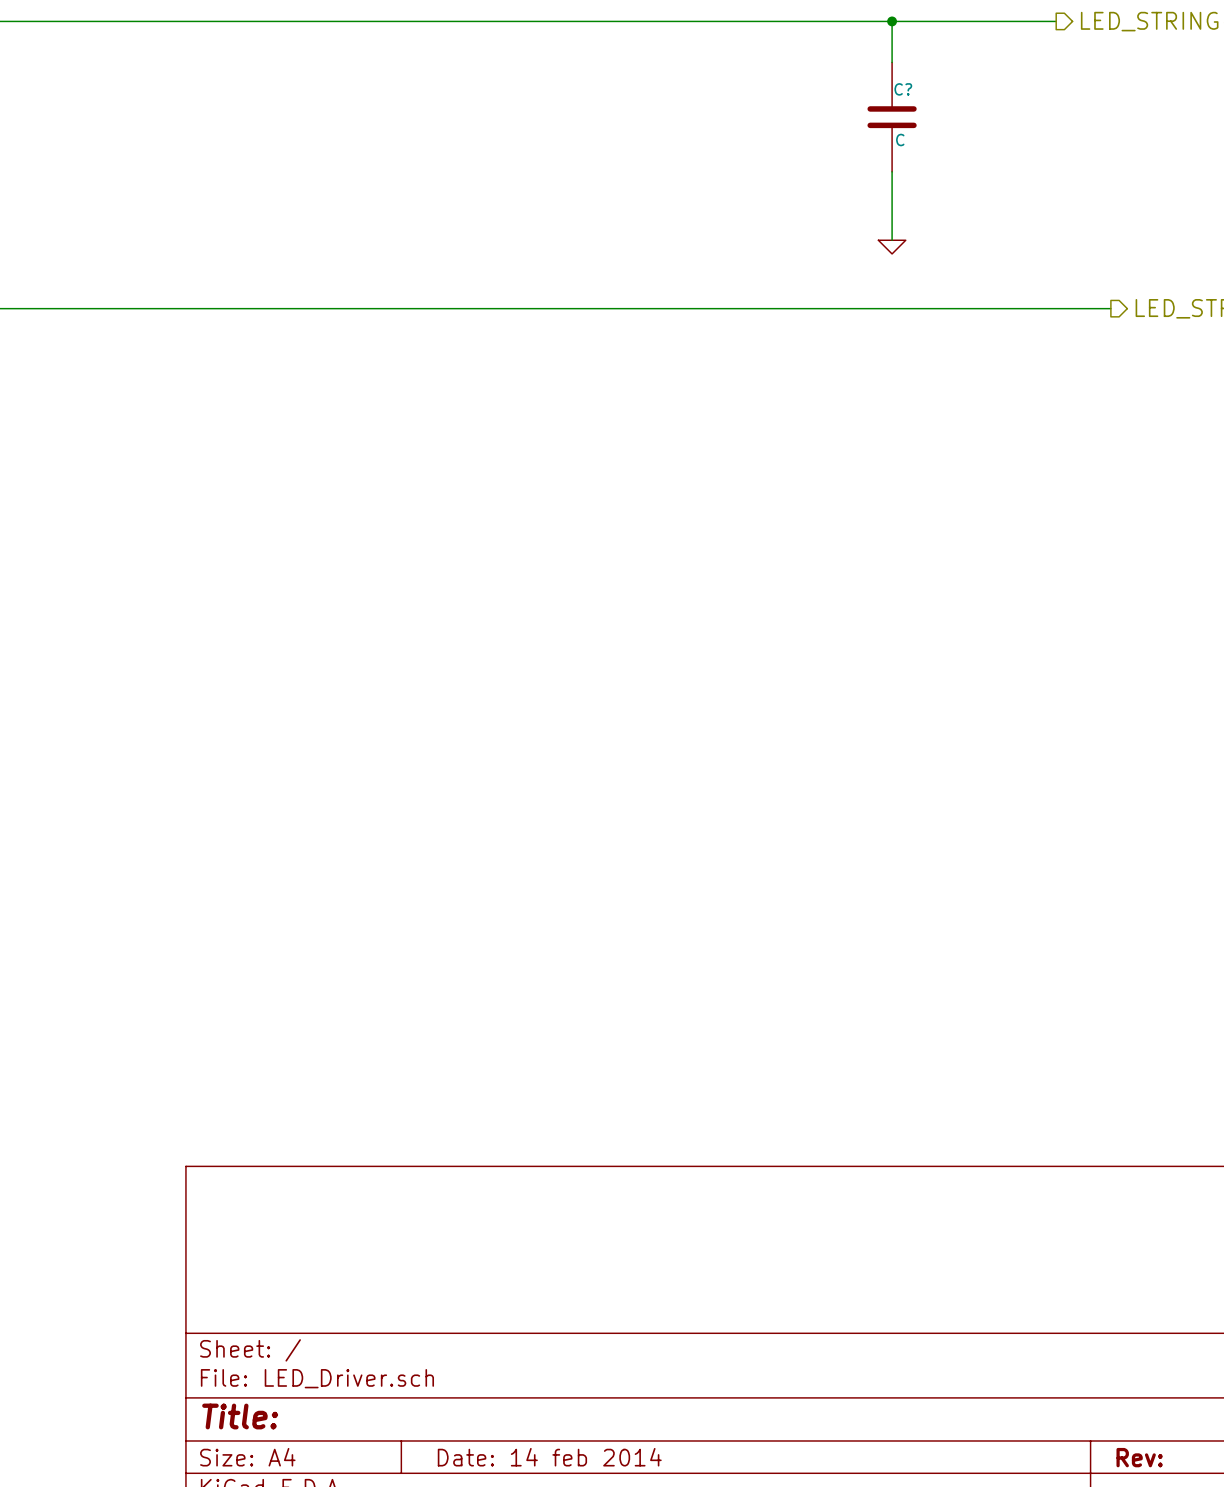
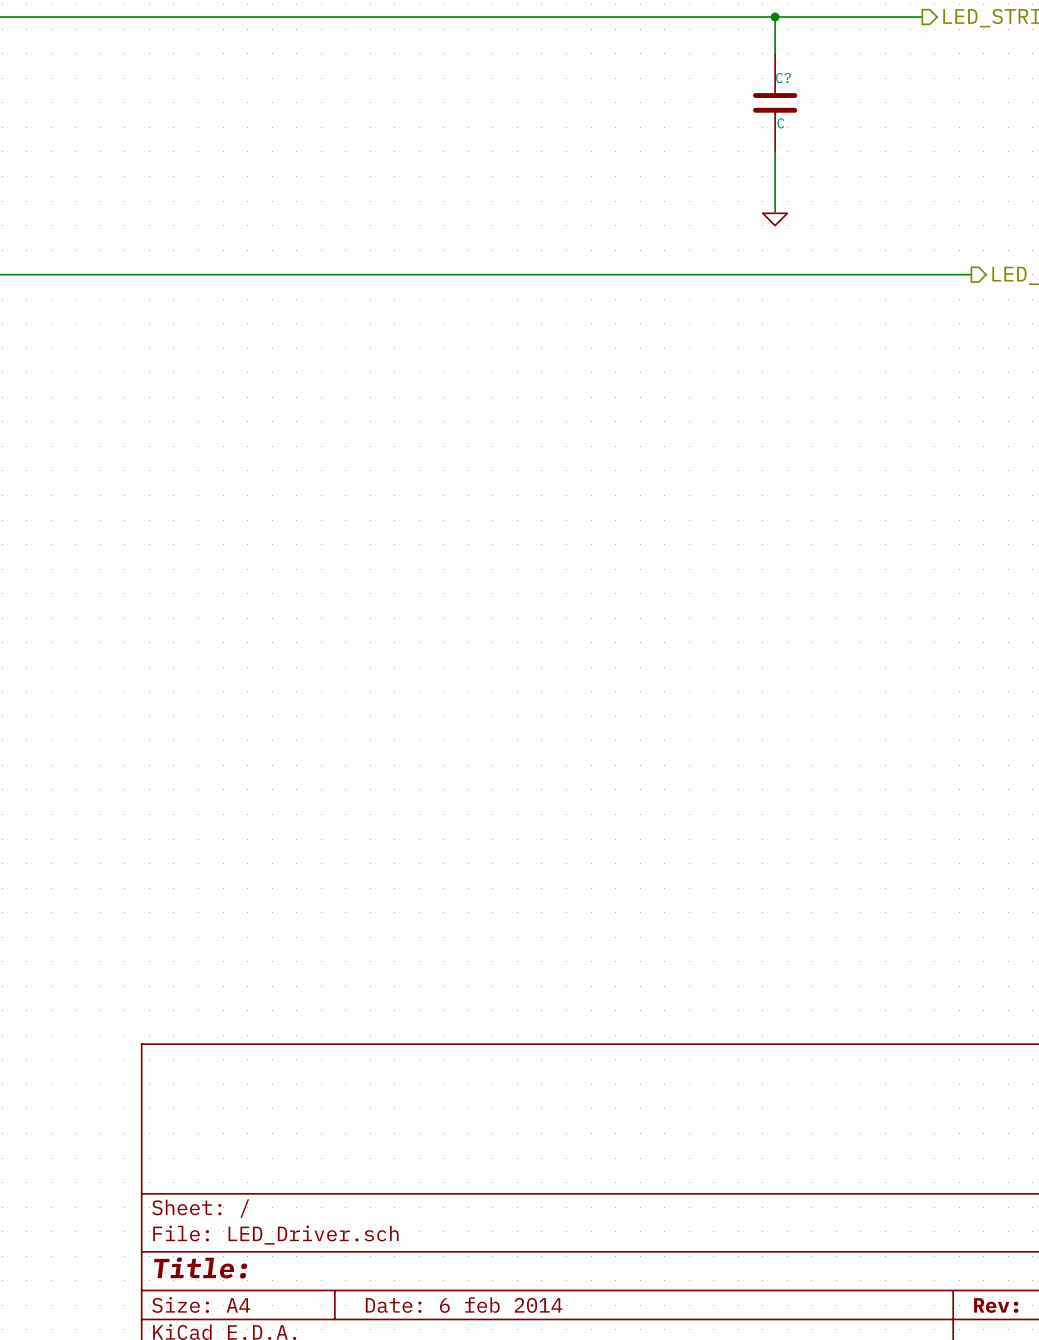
title block: Date: 14 feb 2014 (549, 1457) -> Date: 6 feb 2014 (464, 1305)

